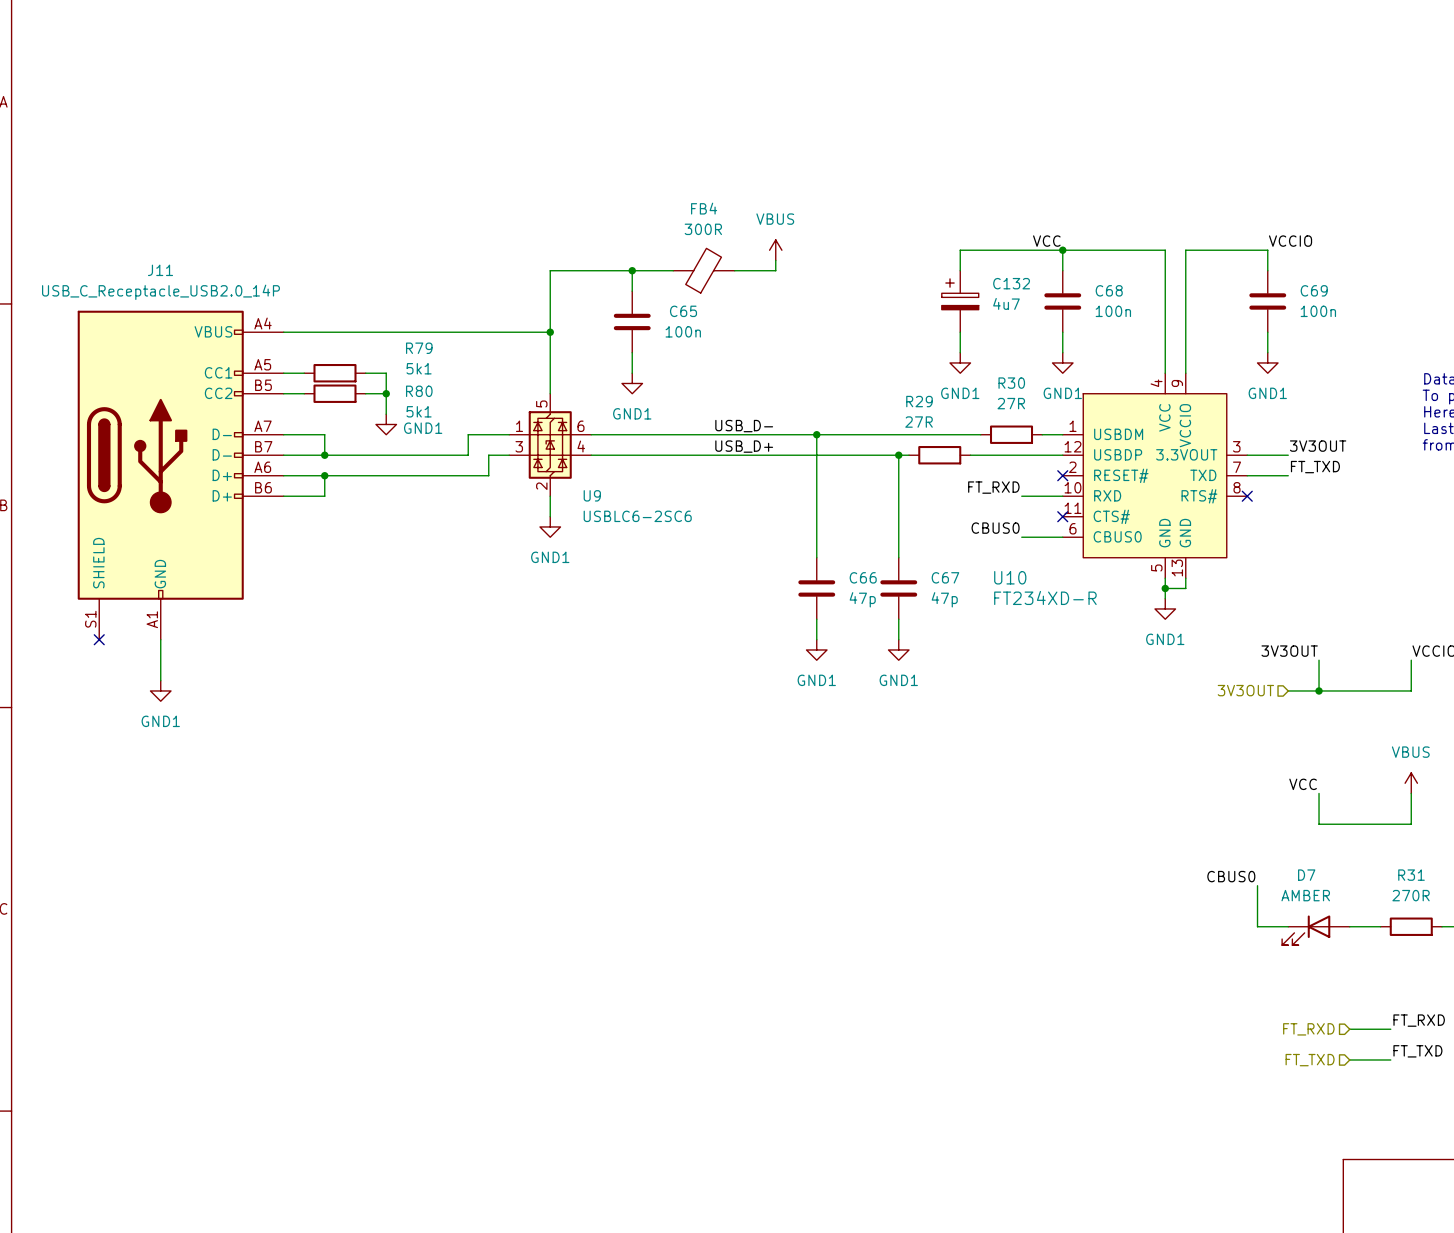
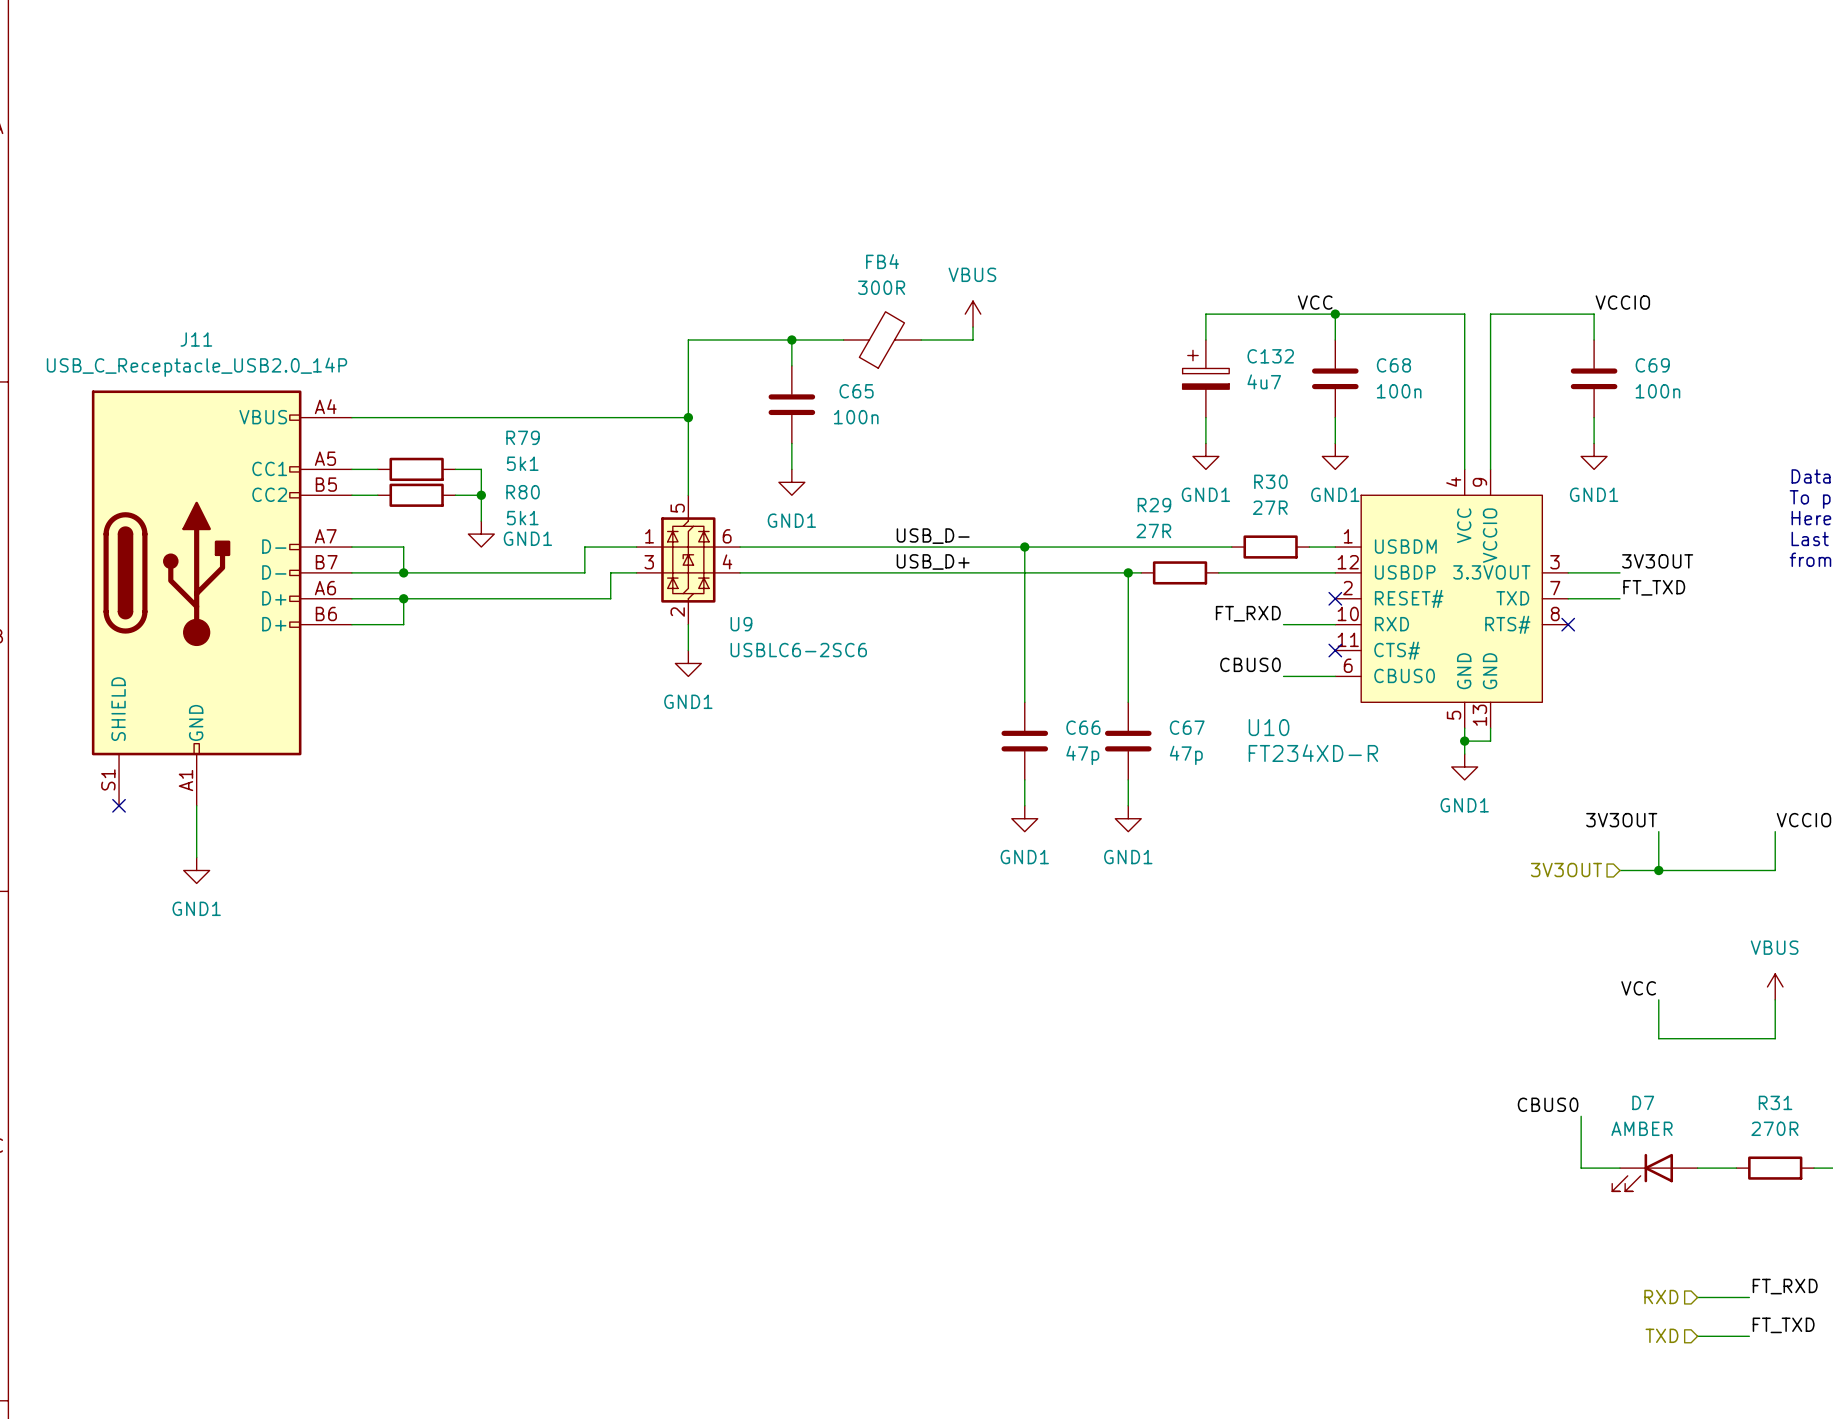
hierarchical label: FT_RXD (1308, 1029) -> RXD (1661, 1297)
hierarchical label: FT_TXD (1310, 1060) -> TXD (1661, 1335)

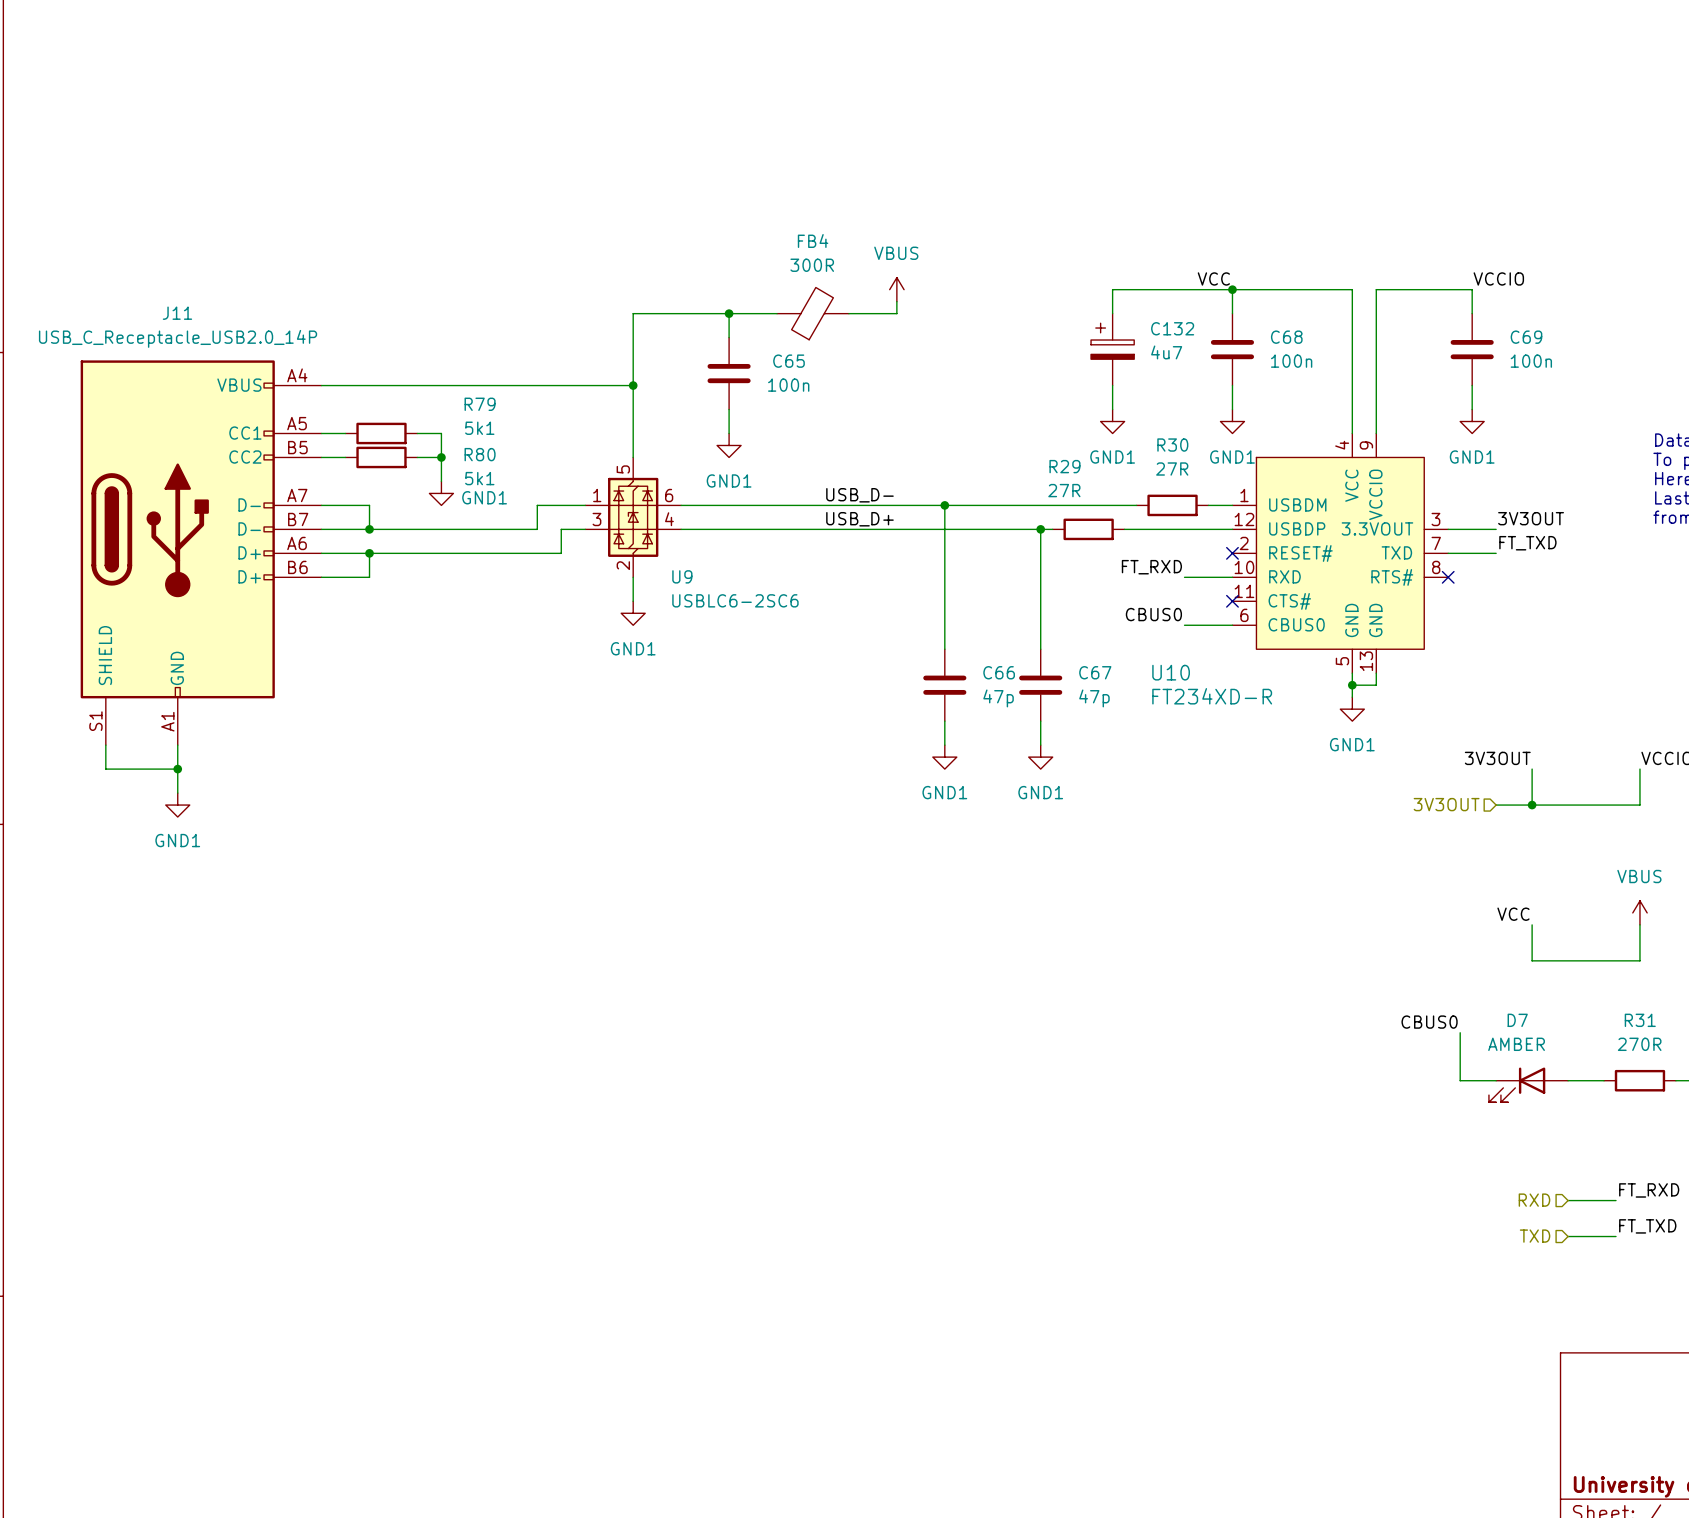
wire: none -> (105, 745) (105, 769) (177, 769)
no-connect mark: (119, 805) -> none
junction: none -> (177, 769)

